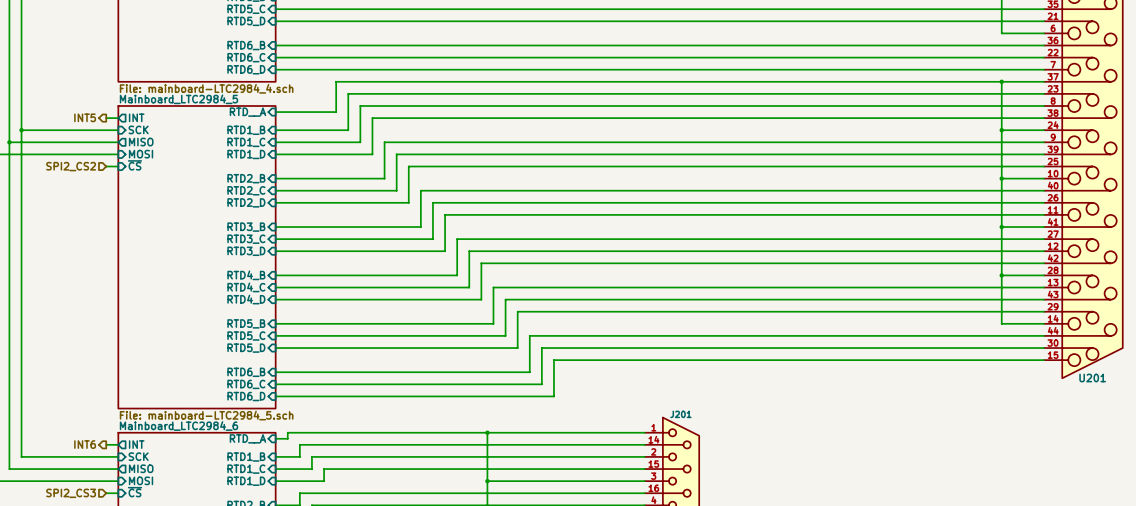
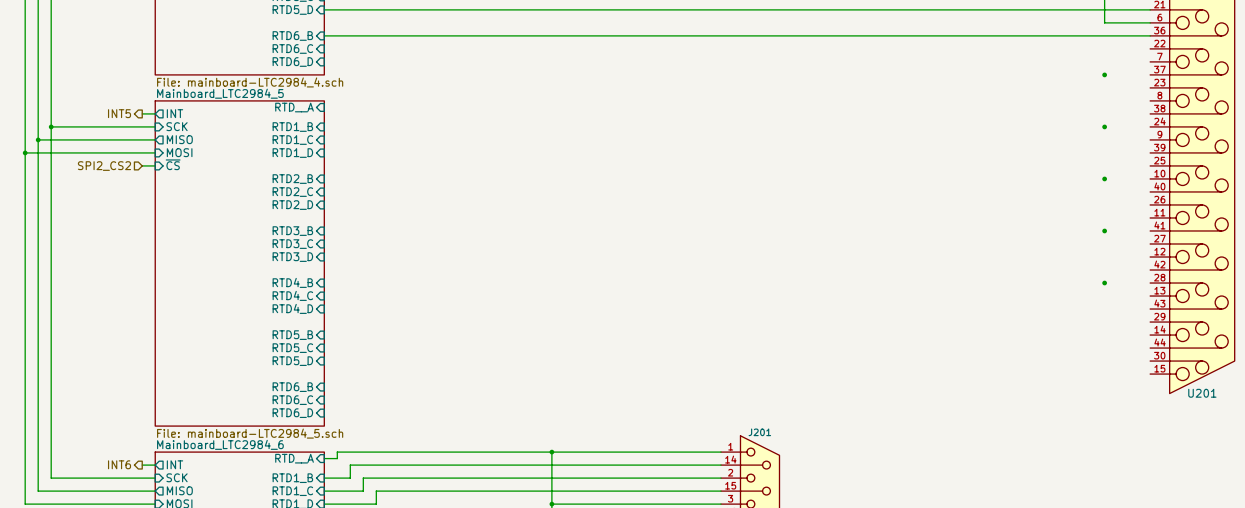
wire: (275, 57) (1044, 57) -> none
wire: (275, 69) (1044, 69) -> none
wire: (1001, 81) (1001, 323) (1044, 323) -> none
wire: (1044, 81) (336, 81) (336, 112) (275, 112) -> none
wire: (1044, 93) (348, 93) (348, 130) (275, 130) -> none
wire: (1044, 106) (360, 106) (360, 142) (275, 142) -> none
wire: (1044, 118) (372, 118) (372, 154) (275, 154) -> none
wire: (1001, 130) (1044, 130) -> none
wire: (1044, 142) (384, 142) (384, 178) (275, 178) -> none
wire: (1044, 154) (396, 154) (396, 190) (275, 190) -> none
wire: (1044, 166) (408, 166) (408, 202) (275, 202) -> none
wire: (1001, 178) (1044, 178) -> none
wire: (1044, 190) (420, 190) (420, 227) (275, 227) -> none
wire: (1044, 202) (432, 202) (432, 239) (275, 239) -> none
wire: (1044, 214) (445, 214) (445, 251) (275, 251) -> none
wire: (1001, 227) (1044, 227) -> none
wire: (1044, 239) (457, 239) (457, 275) (275, 275) -> none
wire: (1044, 251) (469, 251) (469, 287) (275, 287) -> none
wire: (1044, 263) (481, 263) (481, 299) (275, 299) -> none
wire: (1001, 275) (1044, 275) -> none
wire: (1044, 287) (493, 287) (493, 323) (275, 323) -> none
wire: (1044, 299) (505, 299) (505, 335) (275, 335) -> none
wire: (1044, 311) (517, 311) (517, 348) (275, 348) -> none
wire: (1044, 335) (529, 335) (529, 372) (275, 372) -> none
wire: (1044, 348) (541, 348) (541, 384) (275, 384) -> none
wire: (1044, 360) (553, 360) (553, 396) (275, 396) -> none

